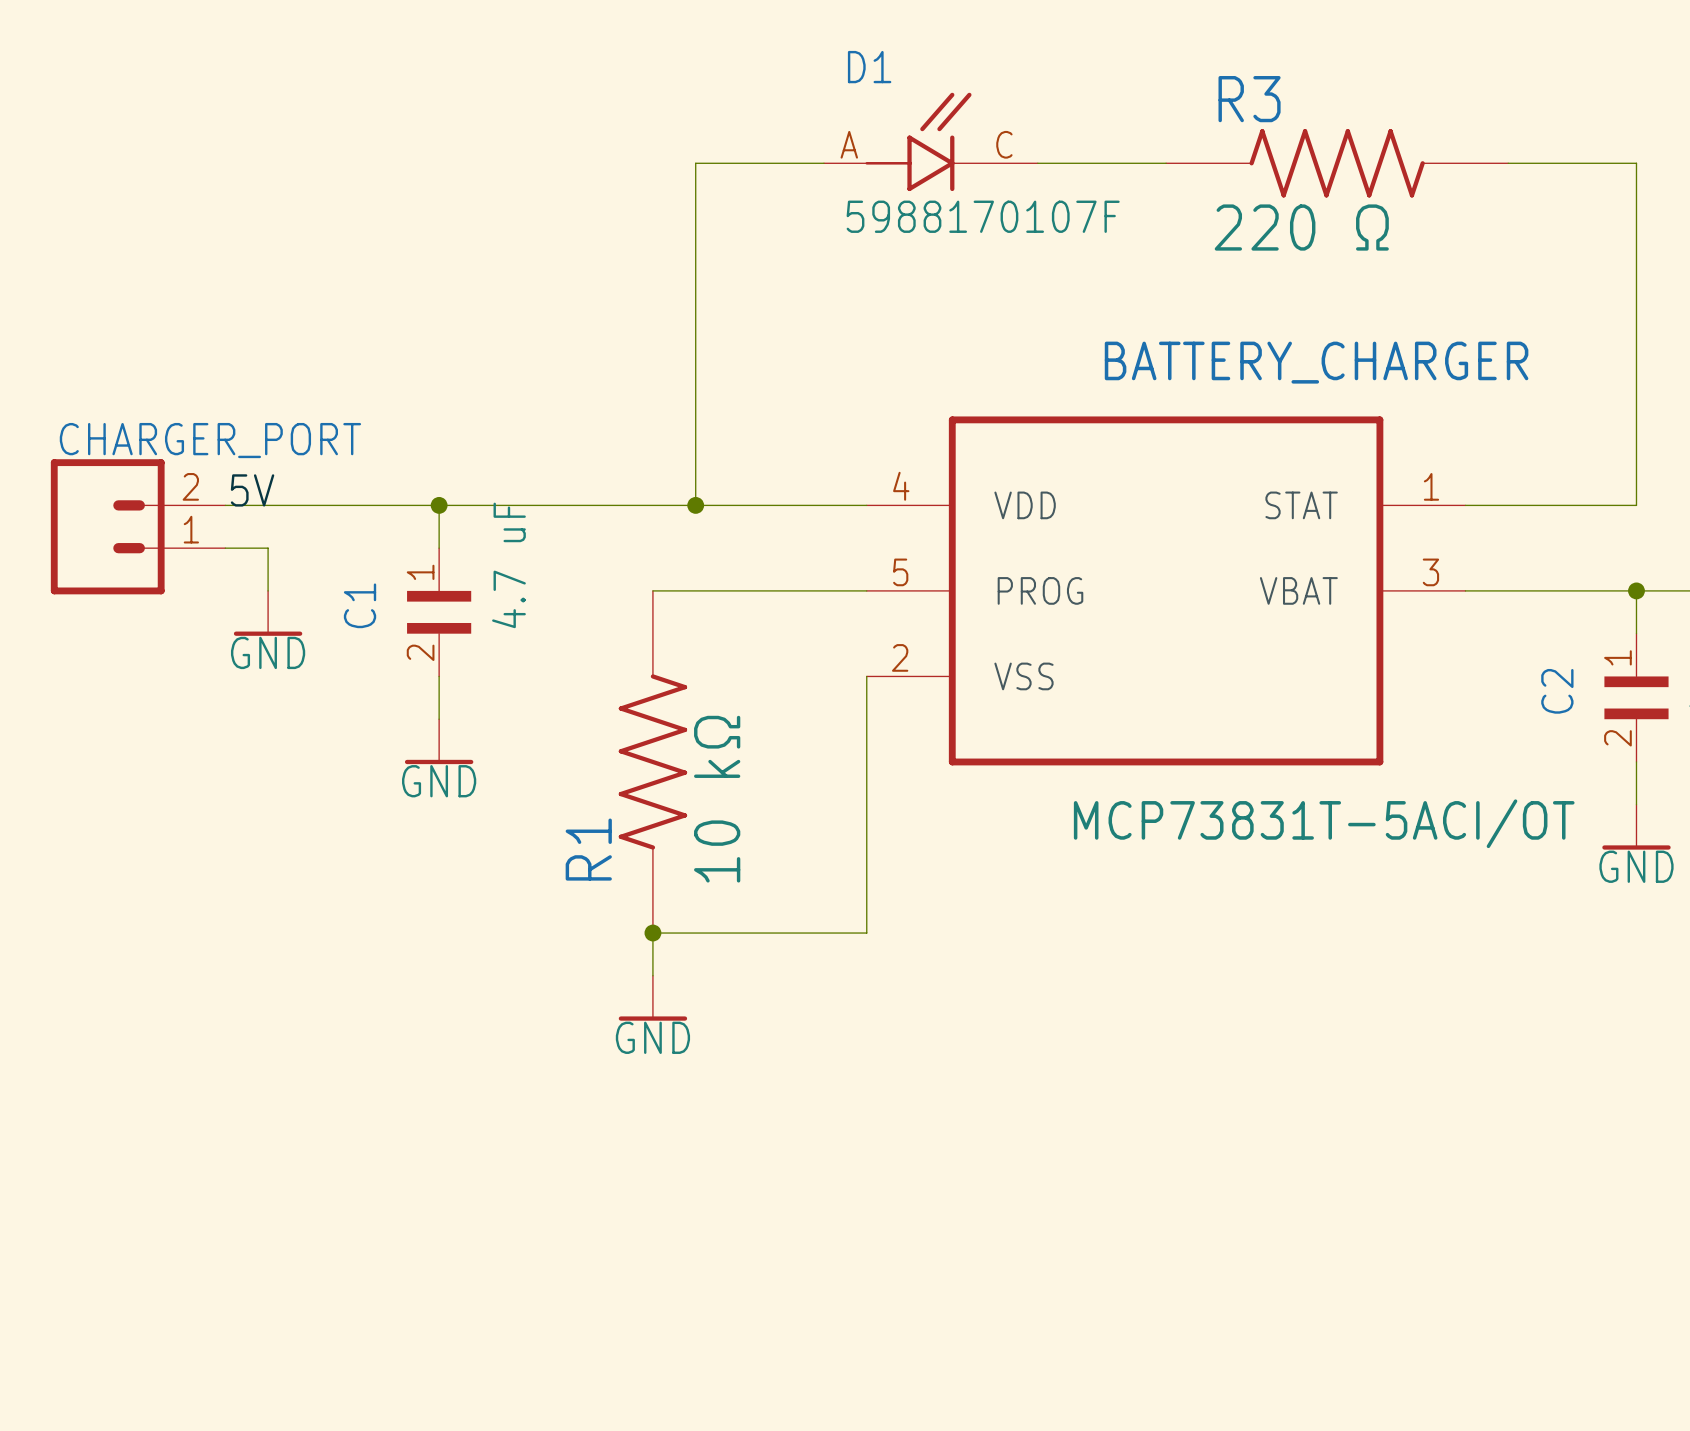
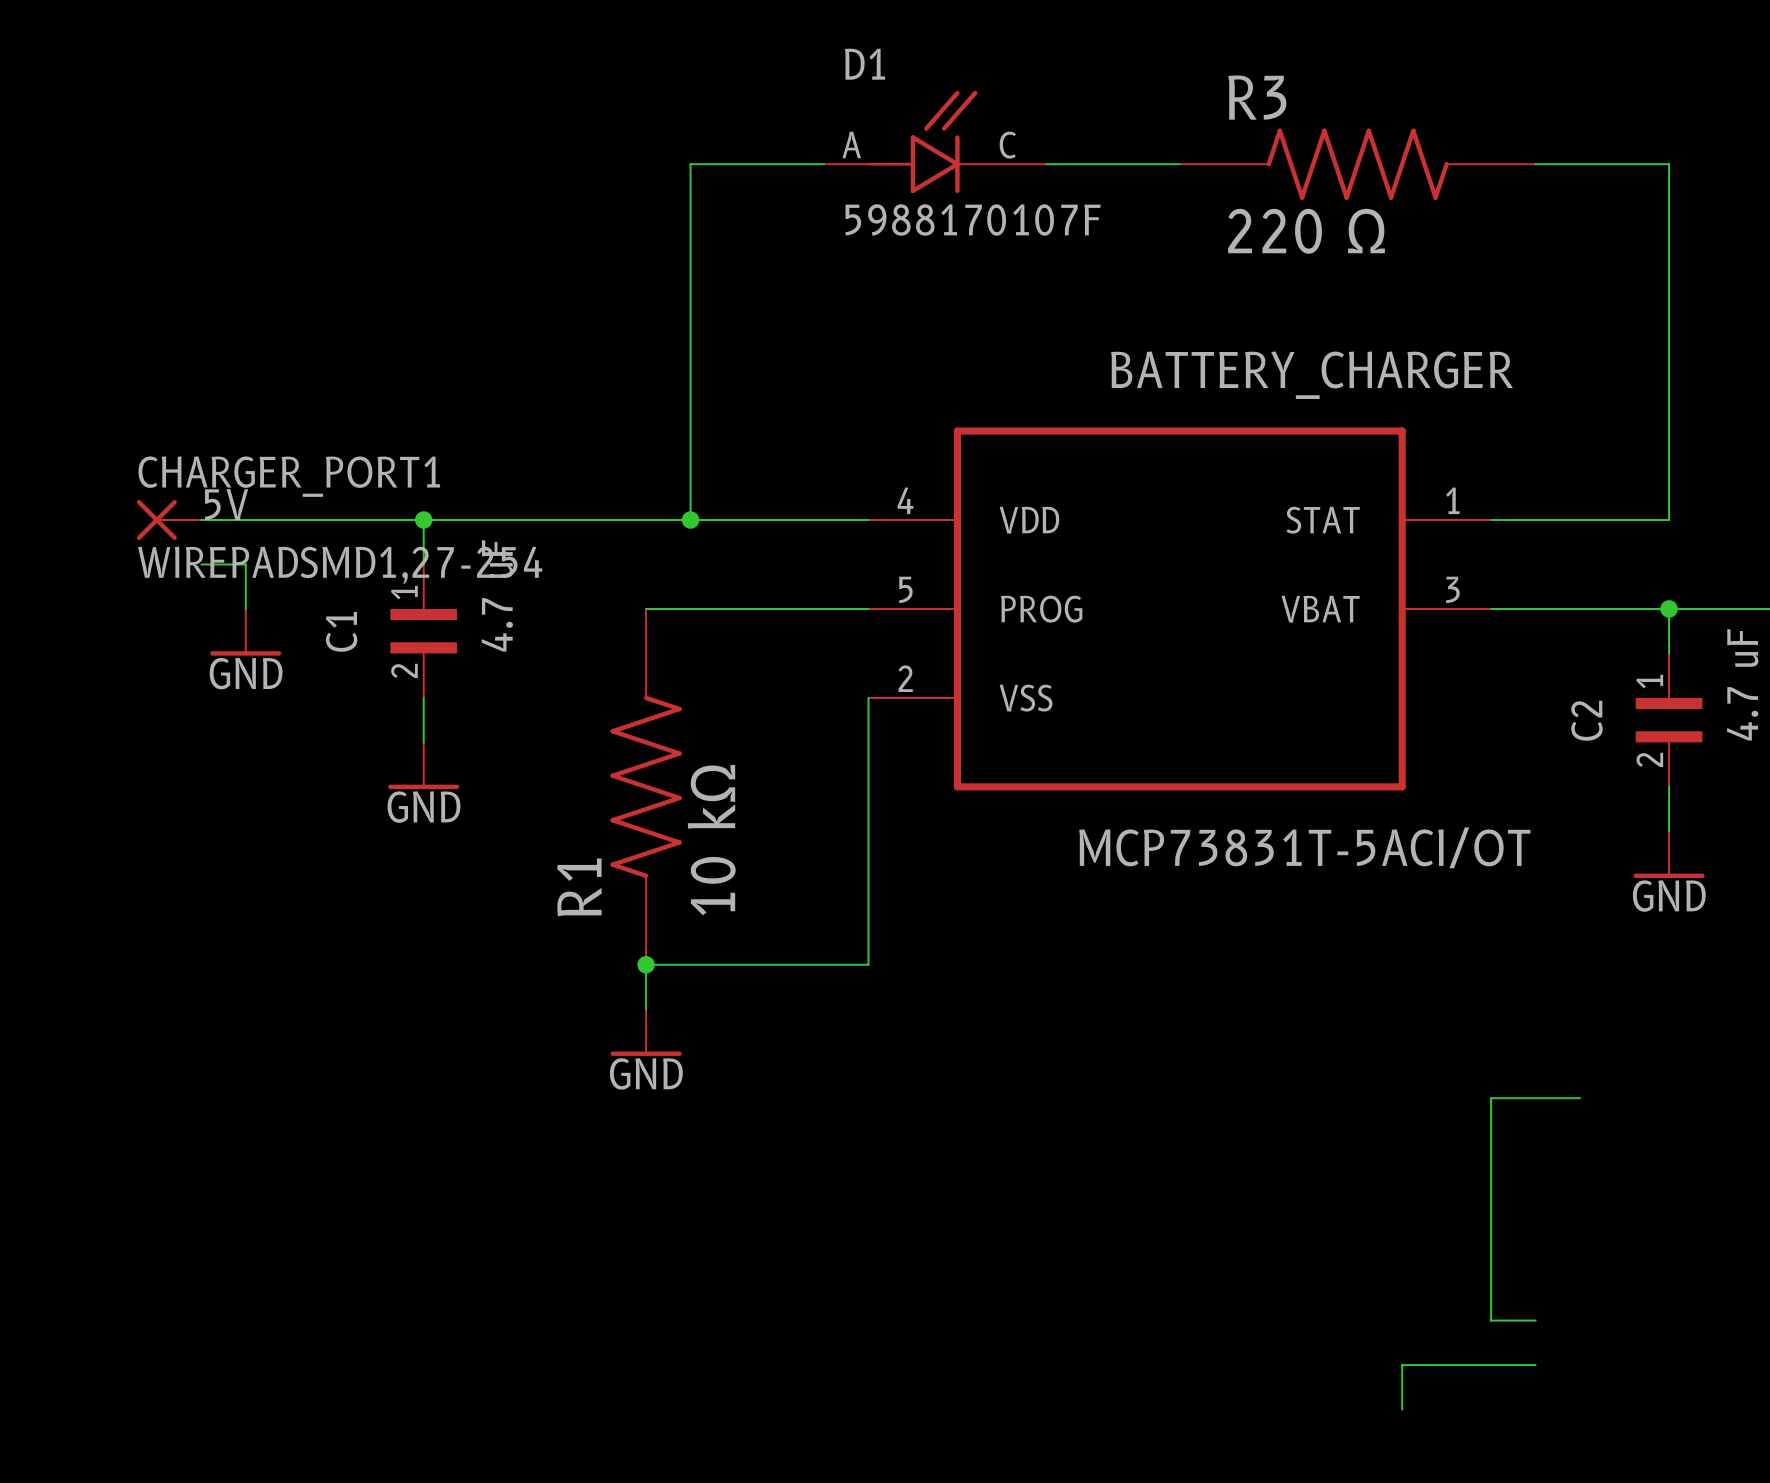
CHARGER_PORT1: none -> WIREPADSMD1,27-254 (169, 520)
CHARGER_PORT: (138, 526) -> none
wire: none -> (1580, 1098) (1491, 1098) (1491, 1320) (1535, 1320)
wire: none -> (1535, 1365) (1402, 1365) (1402, 1409)

